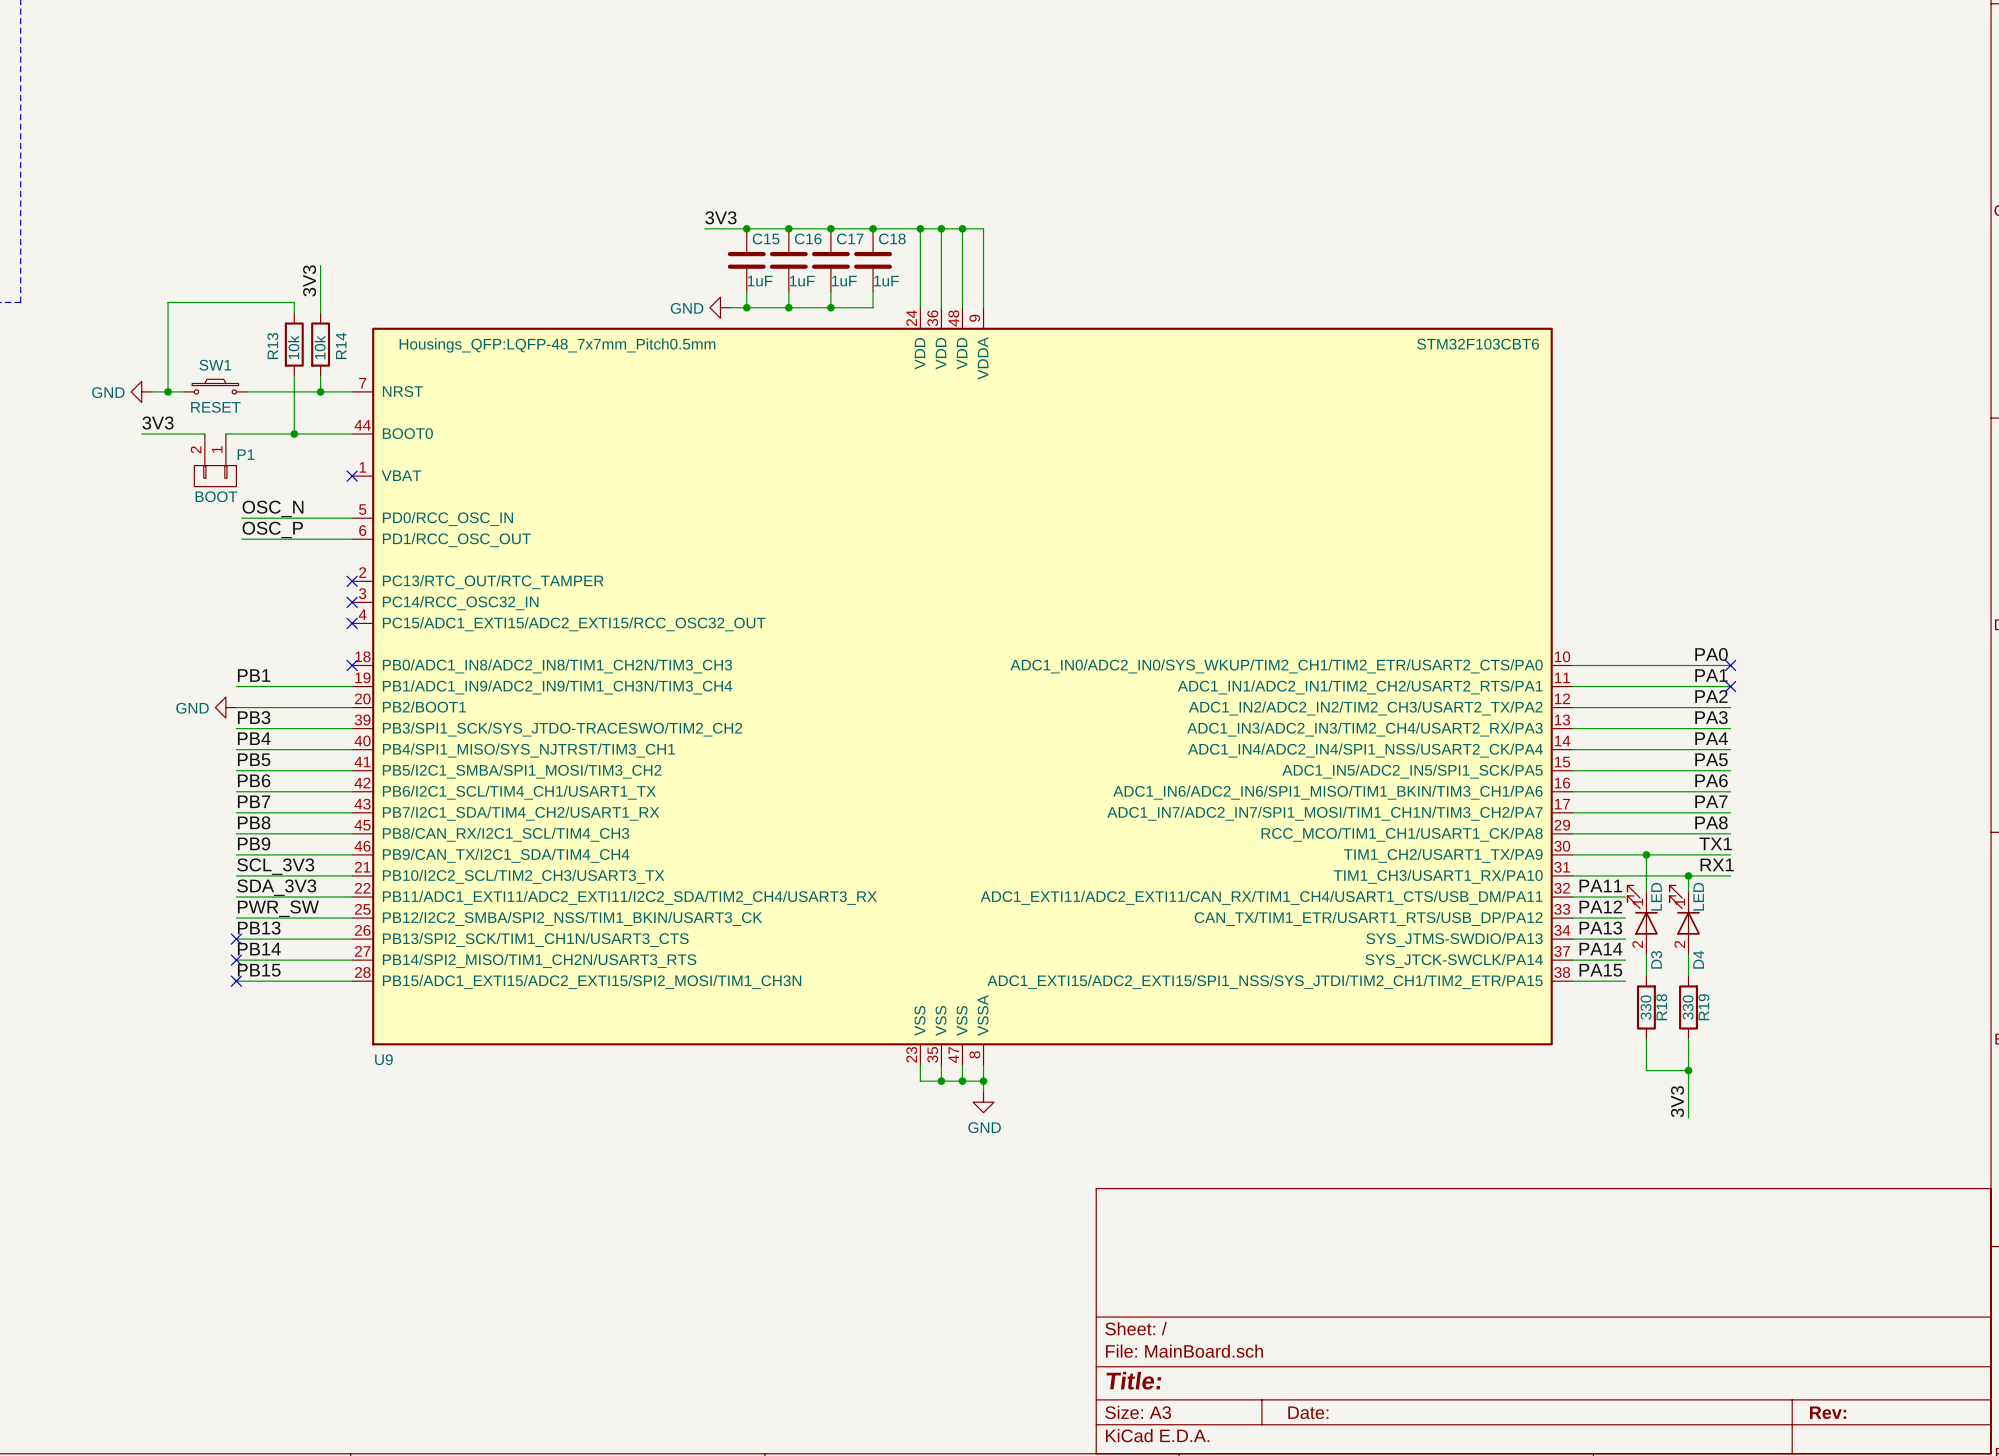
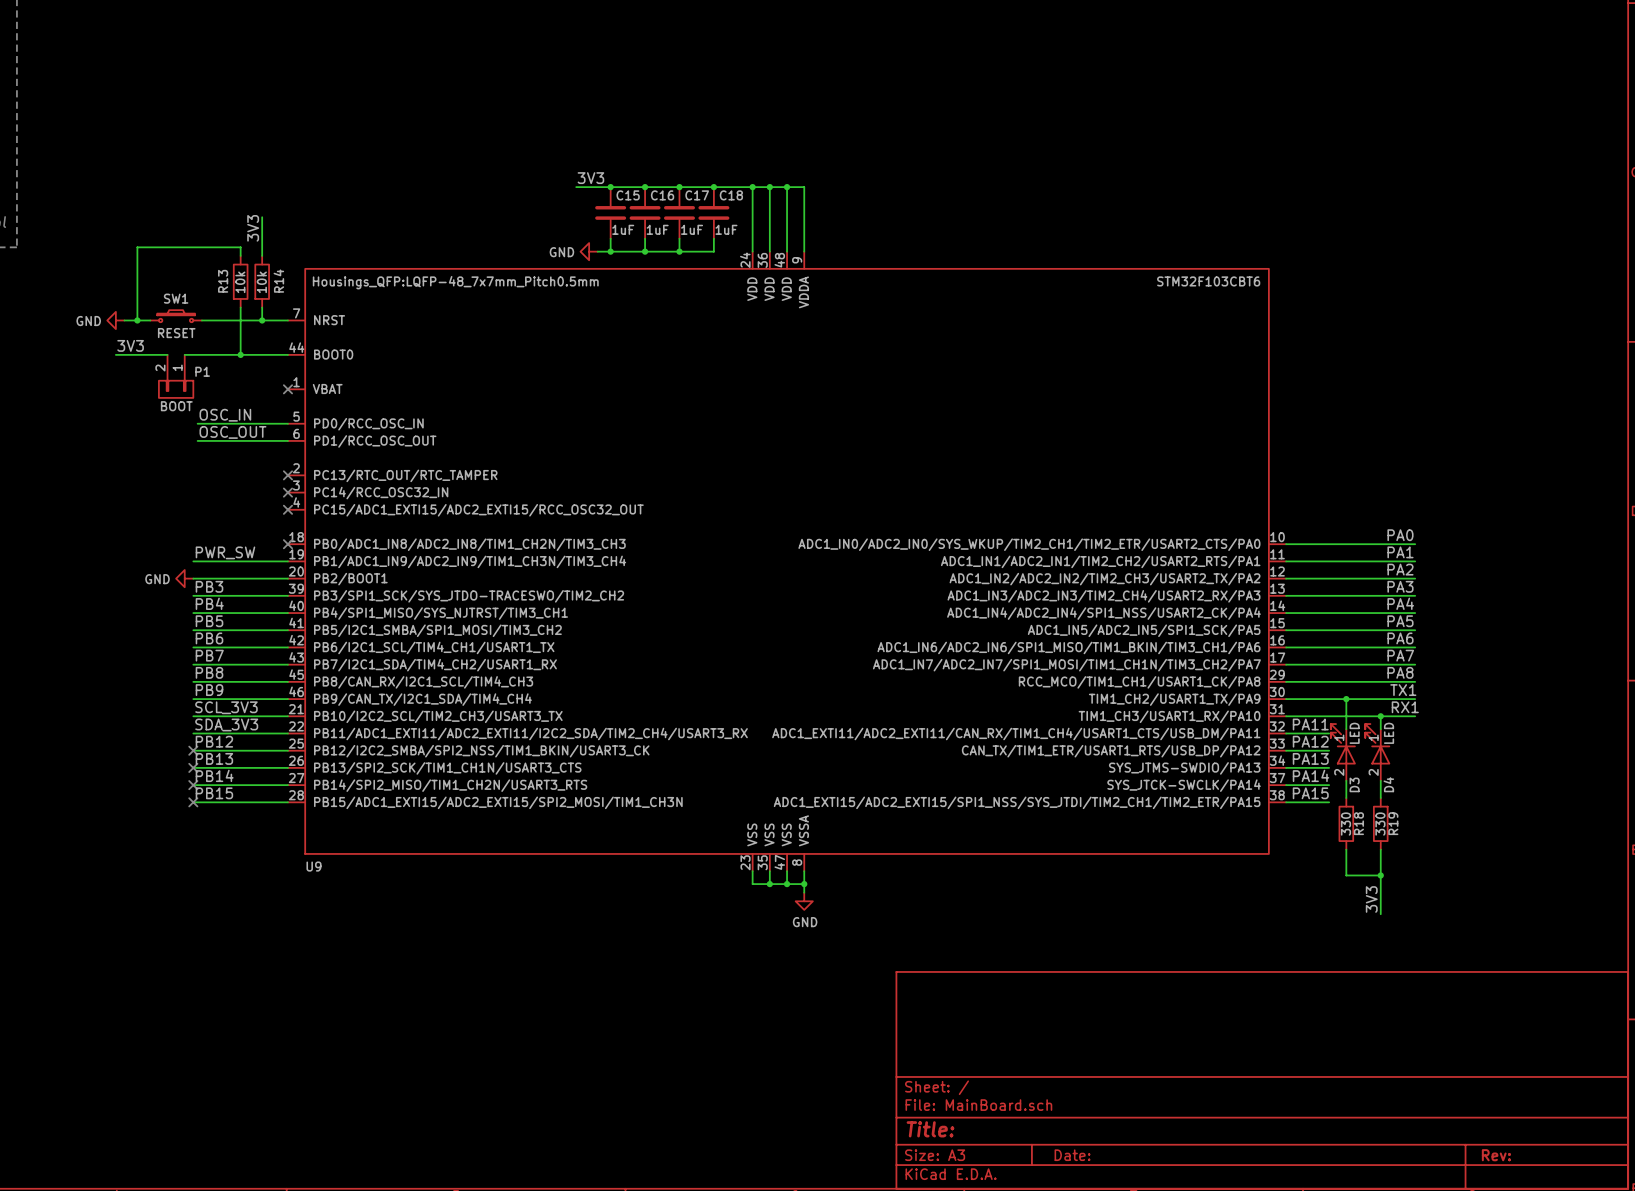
label: OSC_N (272, 508) -> OSC_IN (225, 415)
label: OSC_P (272, 529) -> OSC_OUT (232, 432)
no-connect mark: (1730, 665) -> none
label: PB1 (254, 675) -> PWR_SW (225, 552)
no-connect mark: (1730, 686) -> none
label: PWR_SW (278, 908) -> PB12 (214, 741)
no-connect mark: none -> (193, 750)

